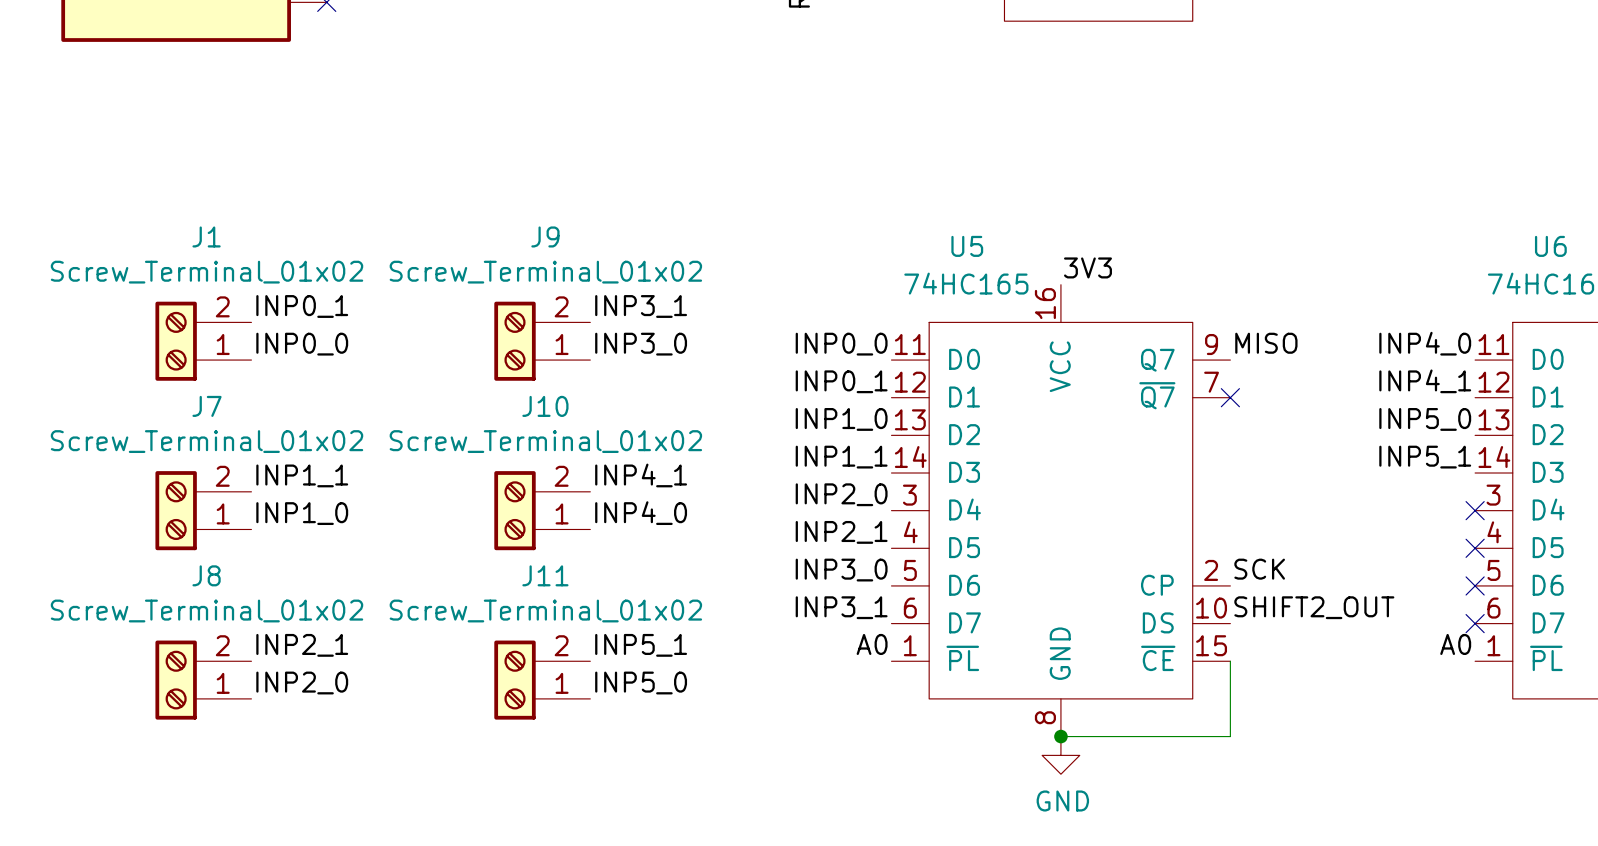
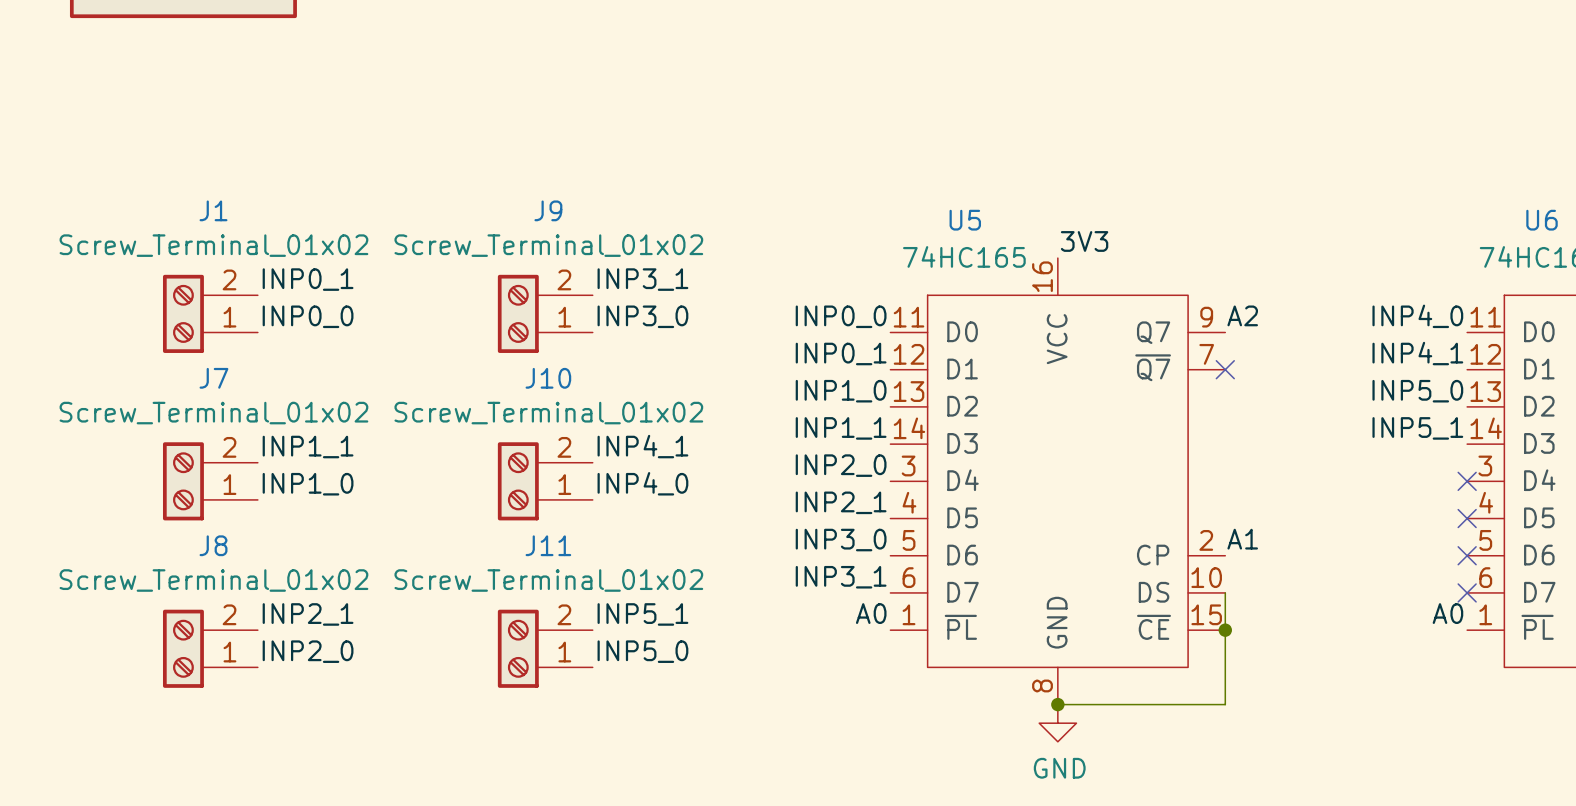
label: MISO (1266, 343) -> A2 (1242, 315)
label: SCK (1259, 569) -> A1 (1242, 539)
label: SHIFT2_OUT (1314, 607) -> none
wire: none -> (1225, 592) (1225, 630)
junction: none -> (1225, 630)

